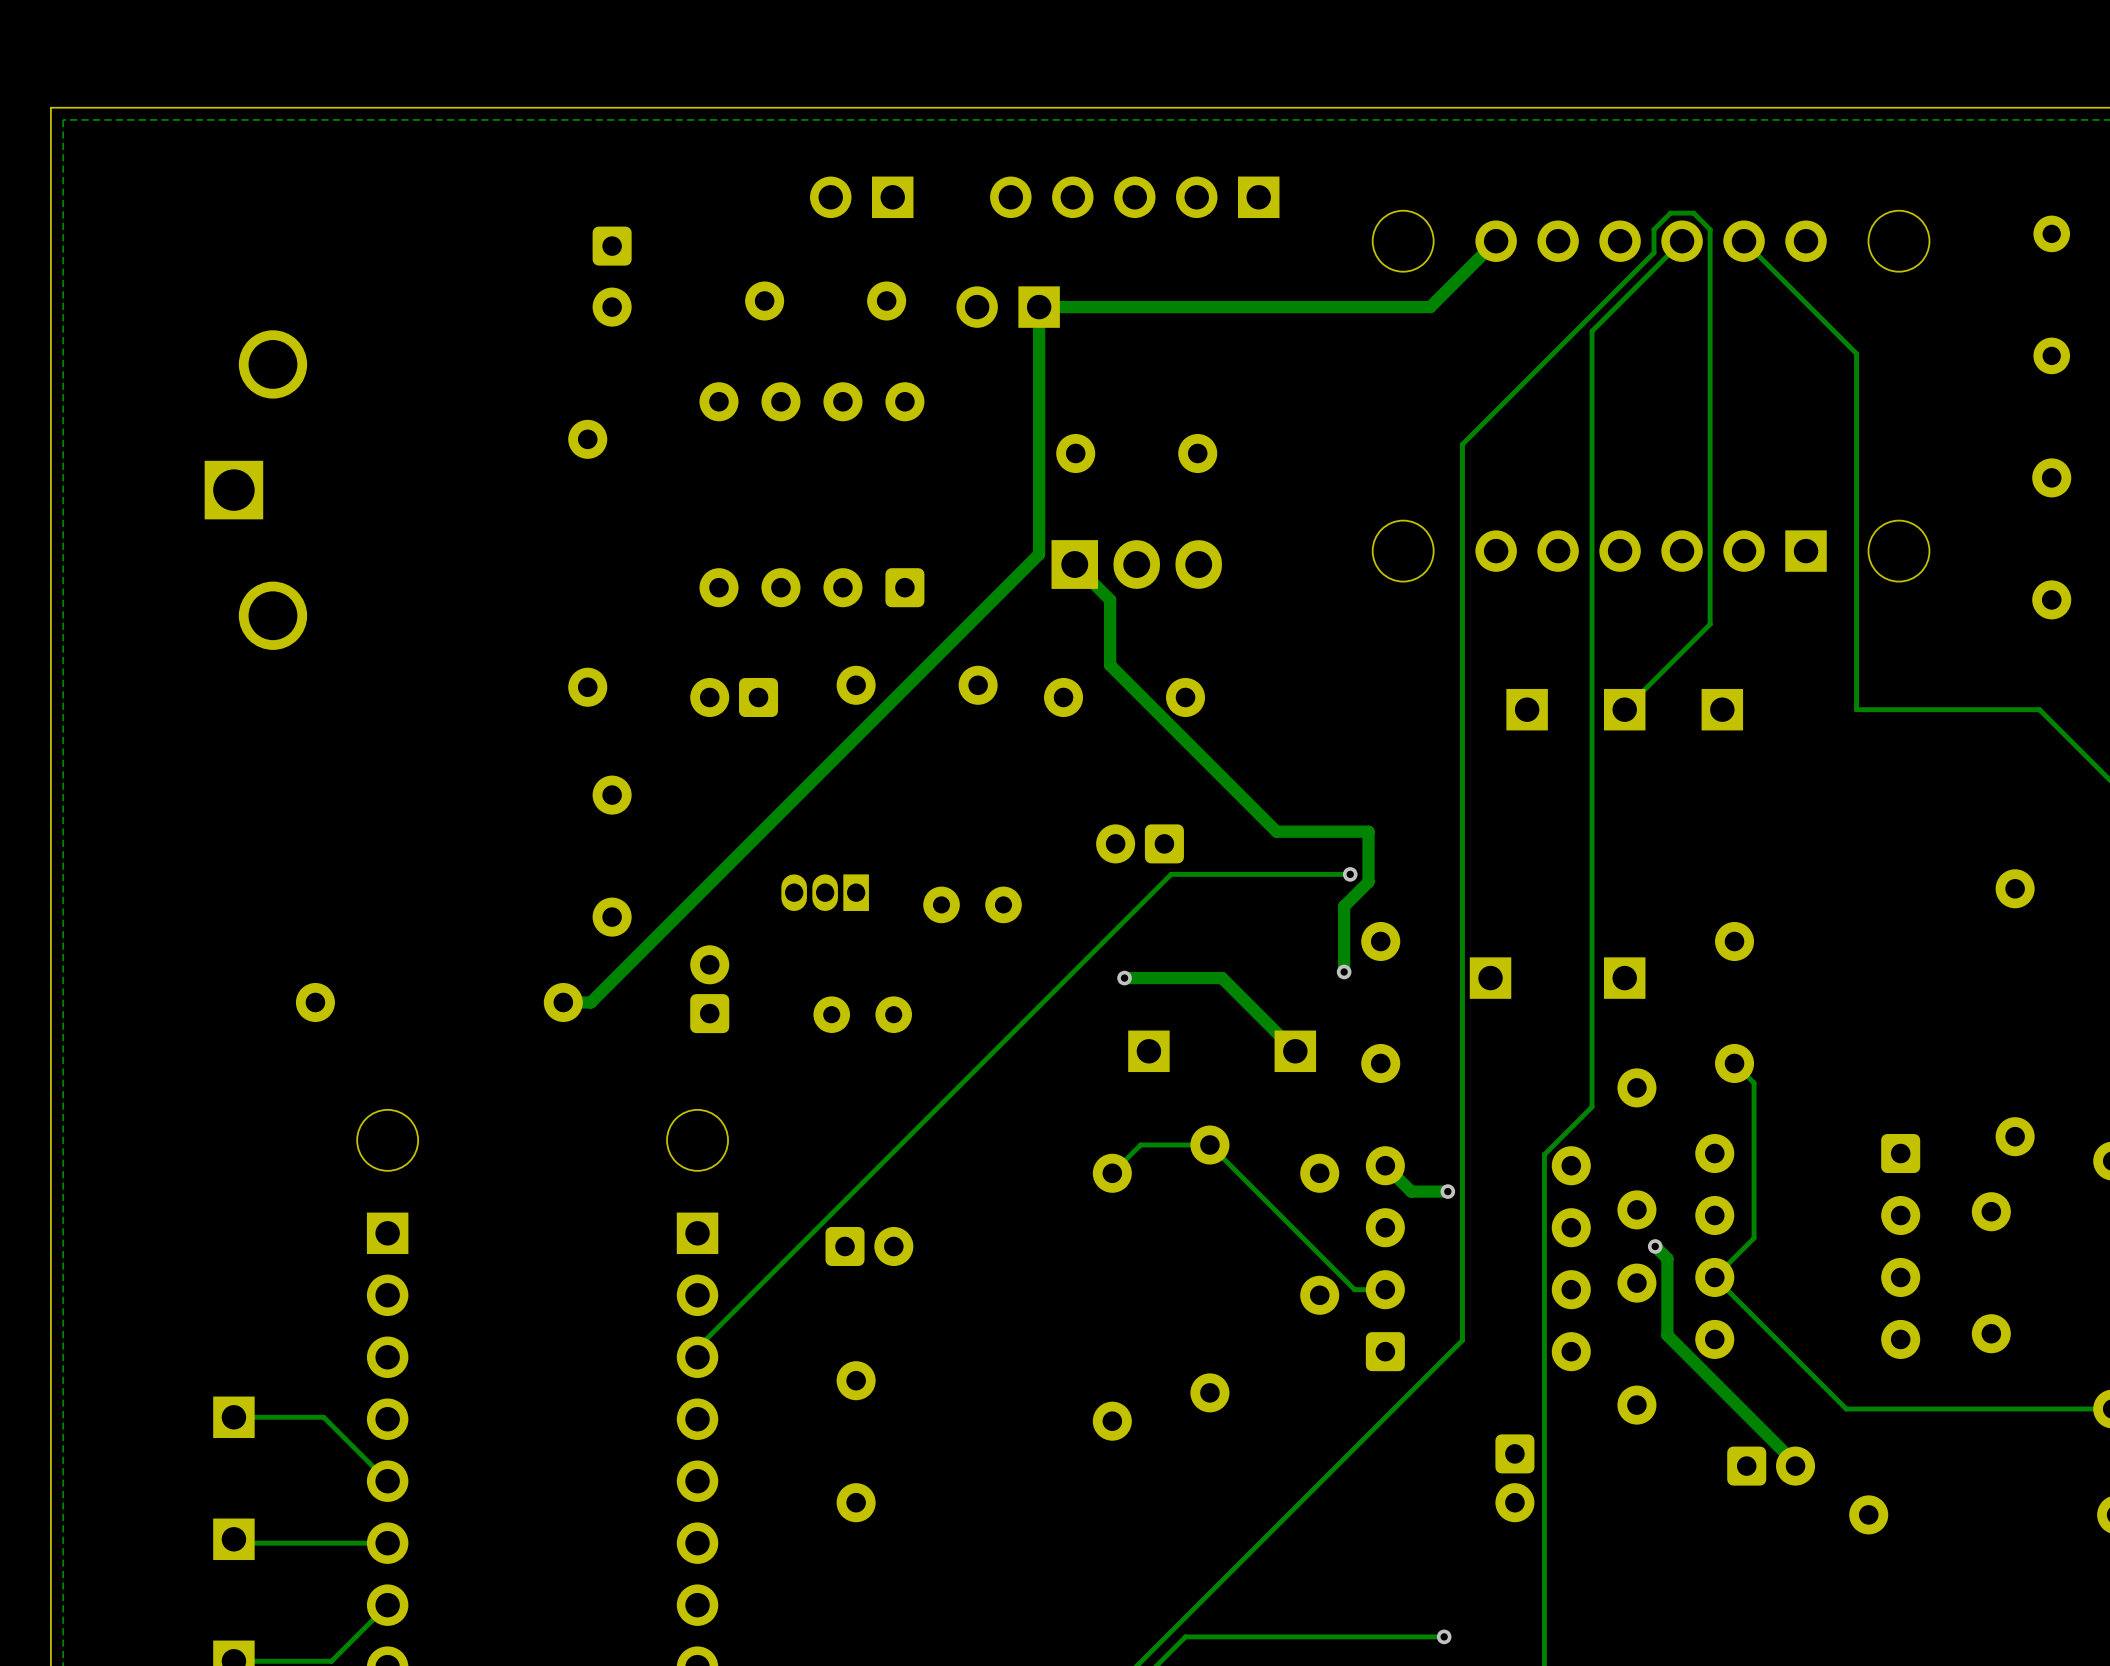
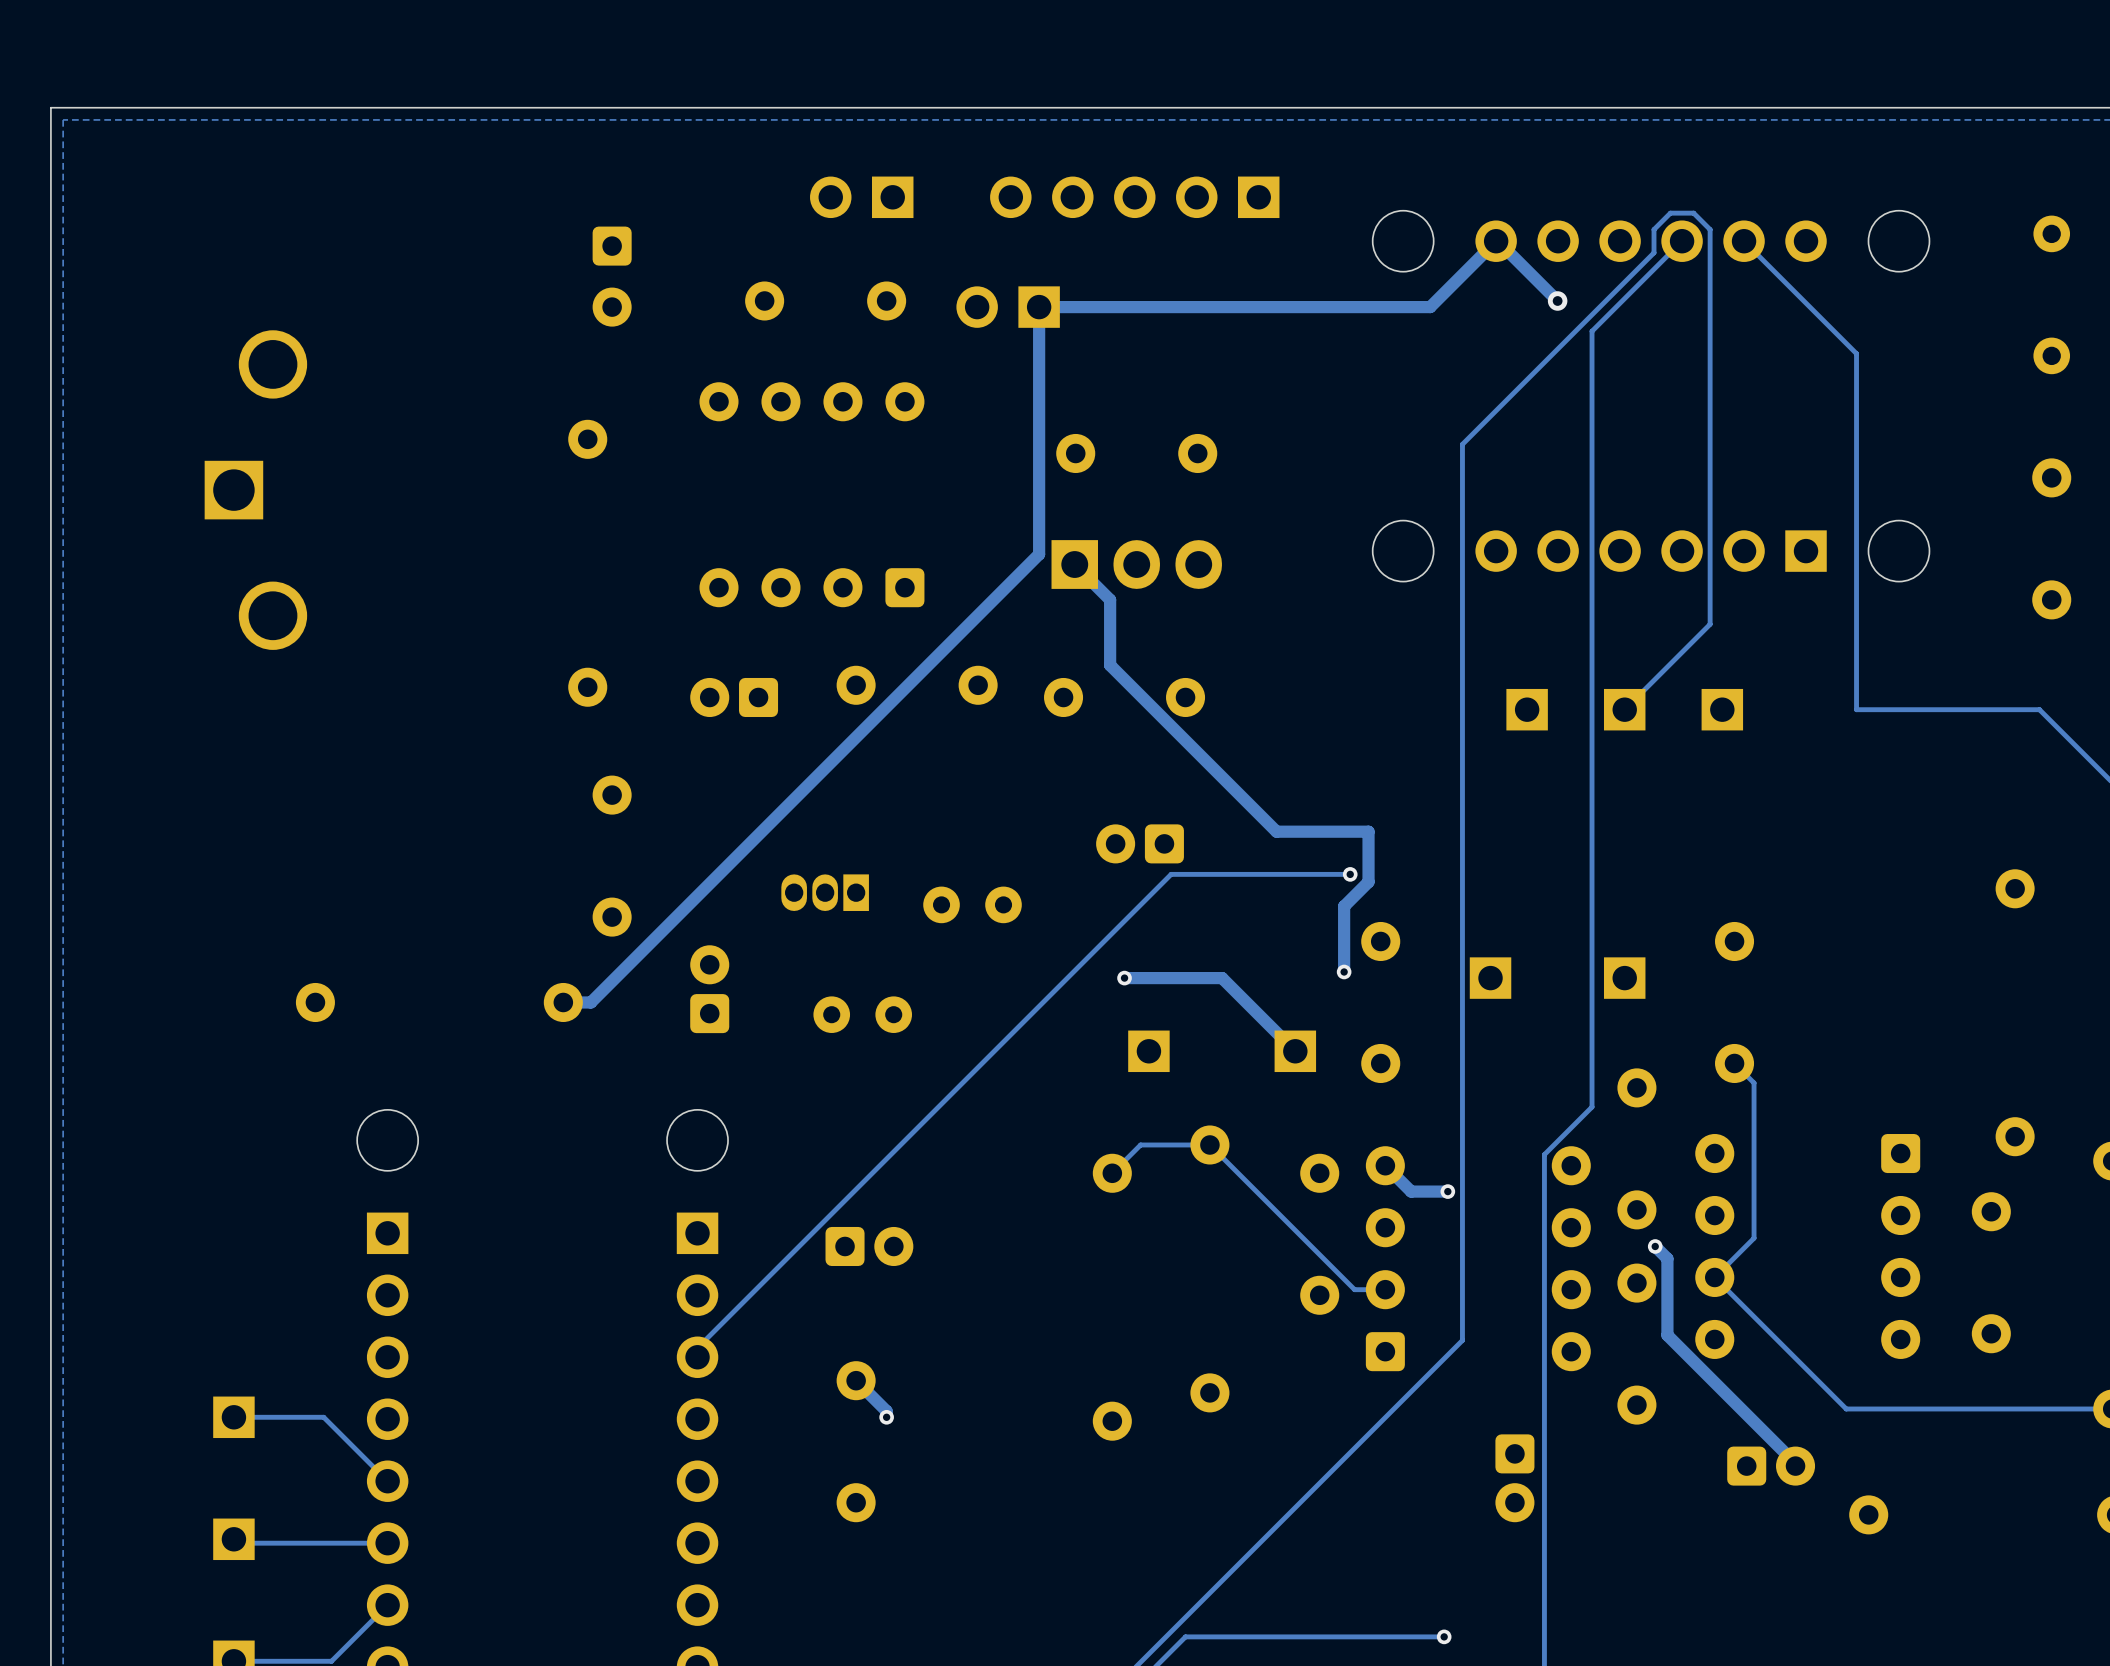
track: none -> (1496, 241) (1557, 300)
via: none -> (1557, 300)
track: none -> (856, 1380) (886, 1411) (886, 1417)
via: none -> (886, 1417)

